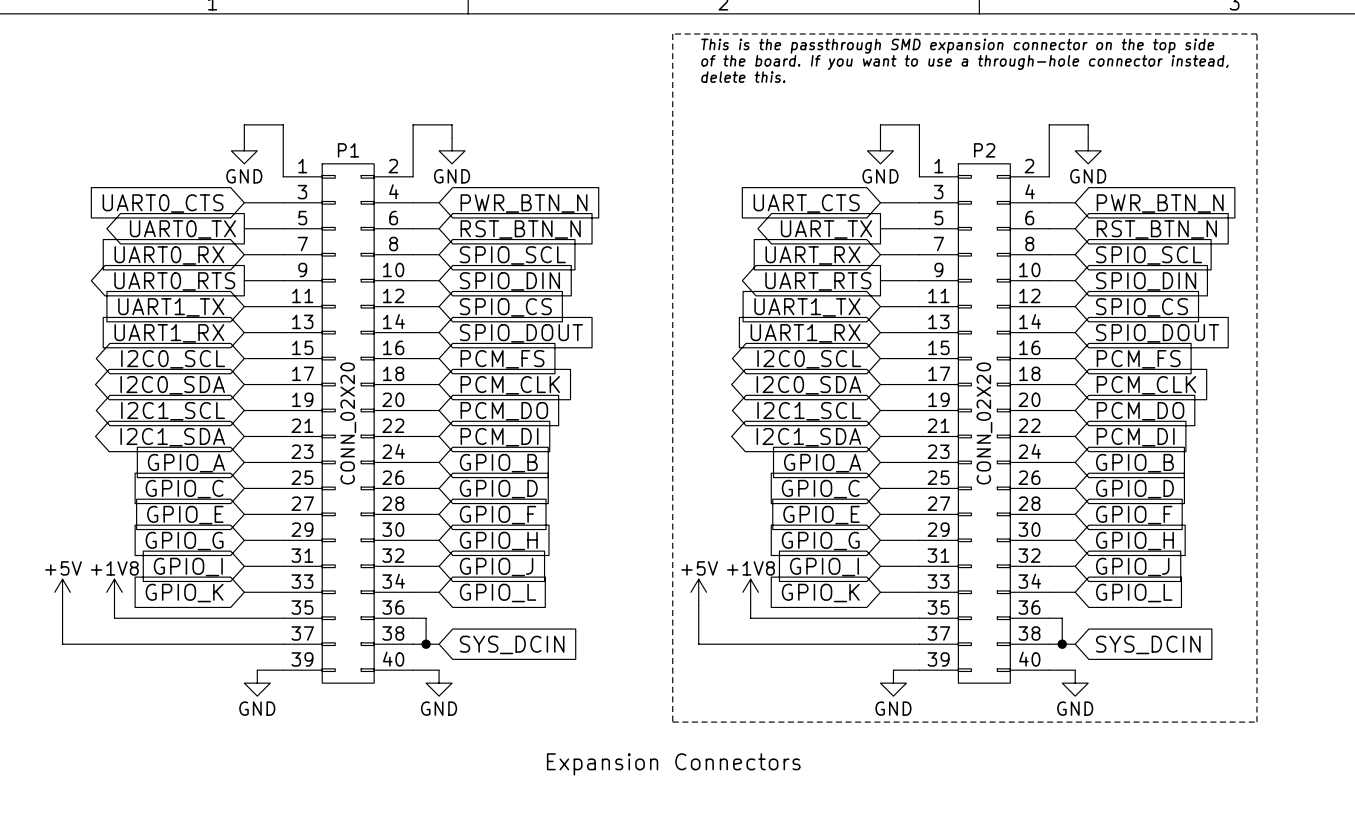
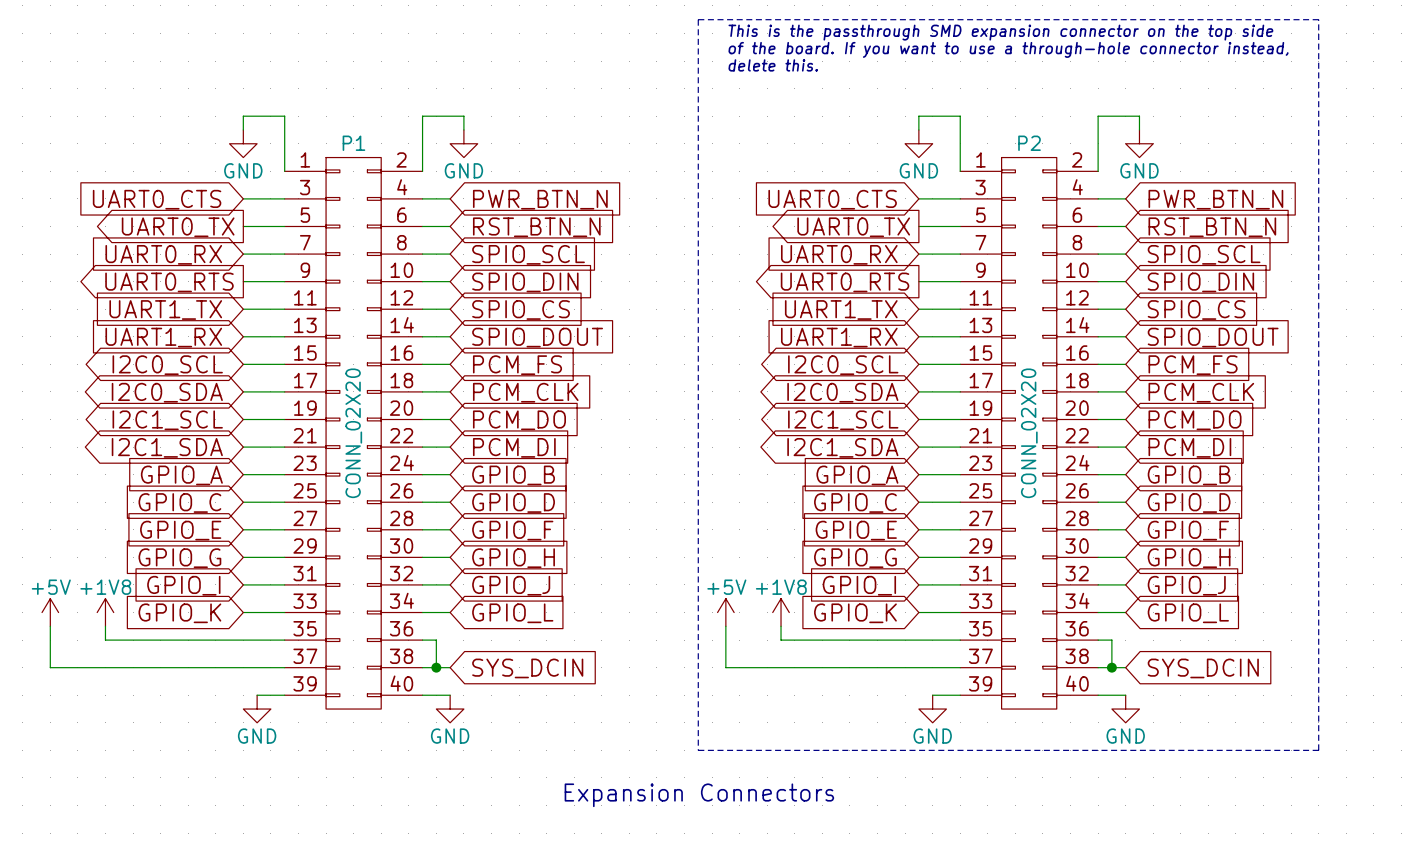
global label: UART_CTS (806, 203) -> UART0_CTS (832, 199)
global label: UART_TX (826, 229) -> UART0_TX (853, 227)
global label: UART_RX (812, 255) -> UART0_RX (839, 254)
global label: UART_RTS (818, 281) -> UART0_RTS (845, 282)

